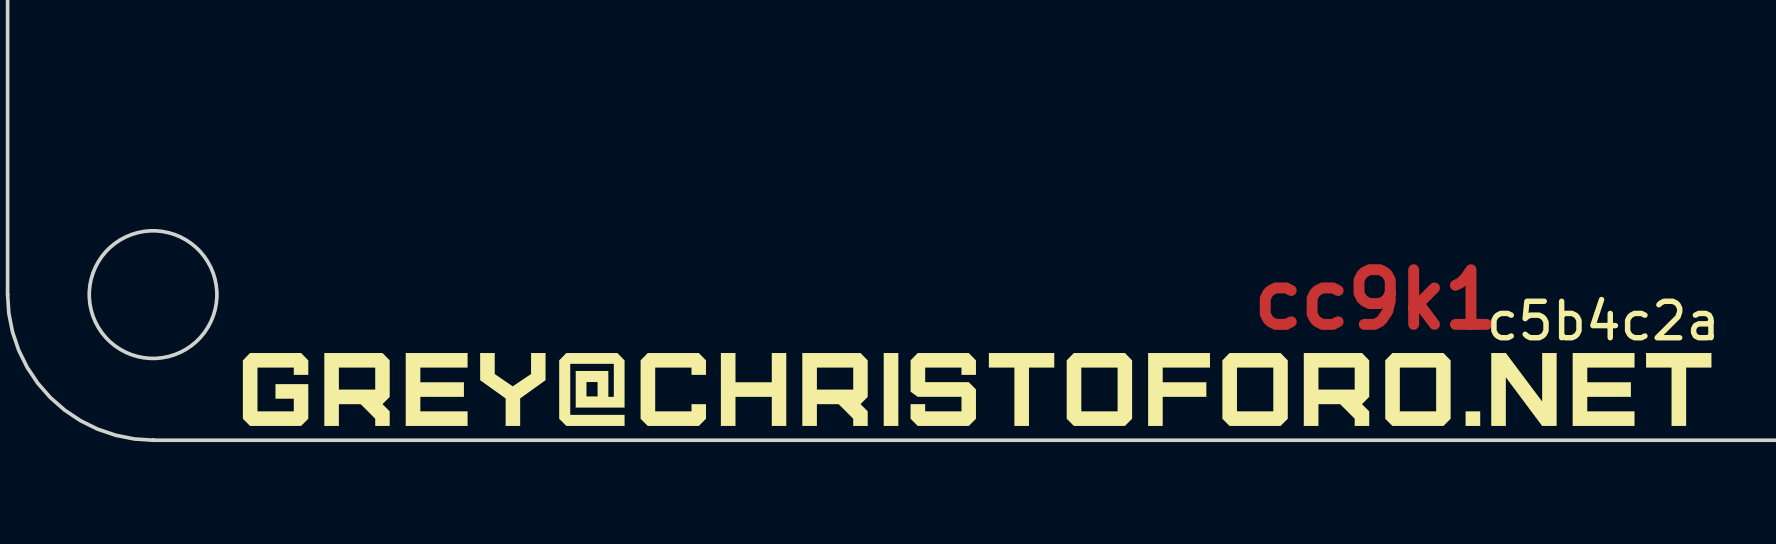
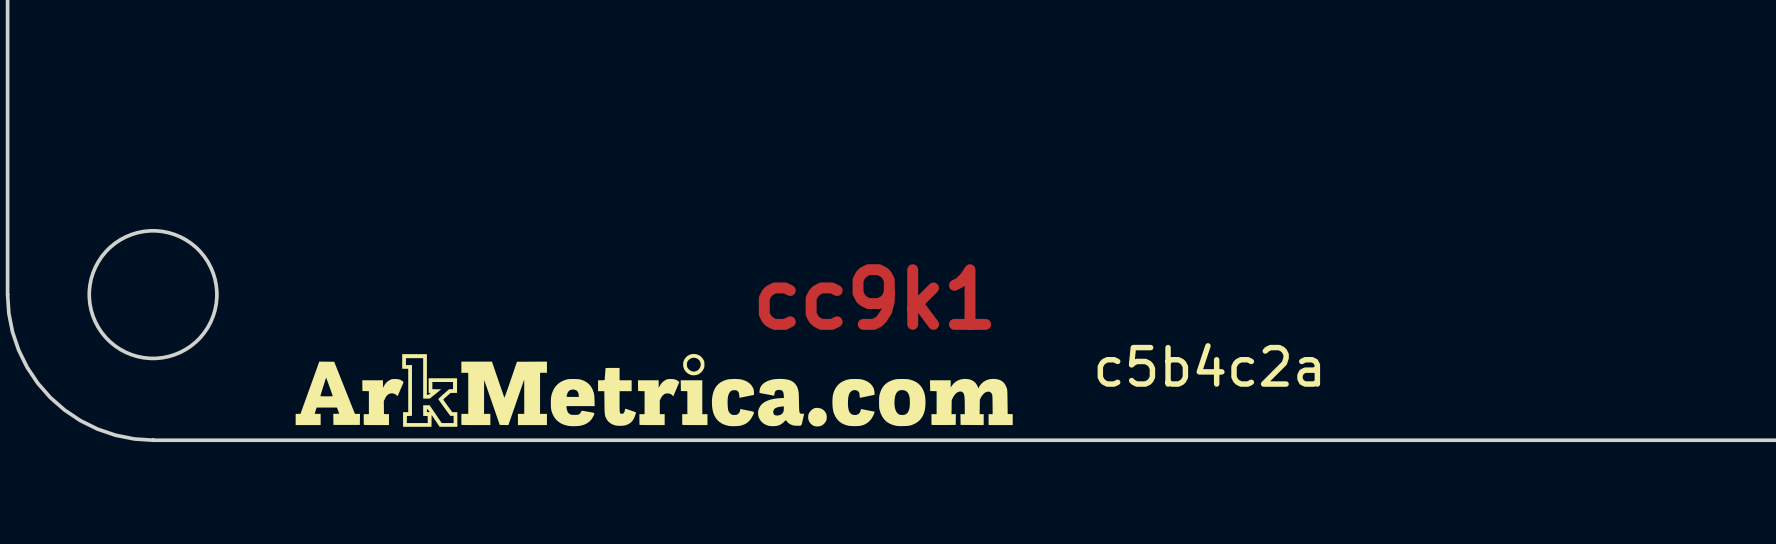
text position: cc9k1 (1375, 297) -> cc9k1 (874, 297)
text position: c5b4c2a (1602, 318) -> c5b4c2a (1208, 364)
drawing: [242, 352, 1712, 426] -> none
drawing: none -> [295, 353, 1013, 427]

